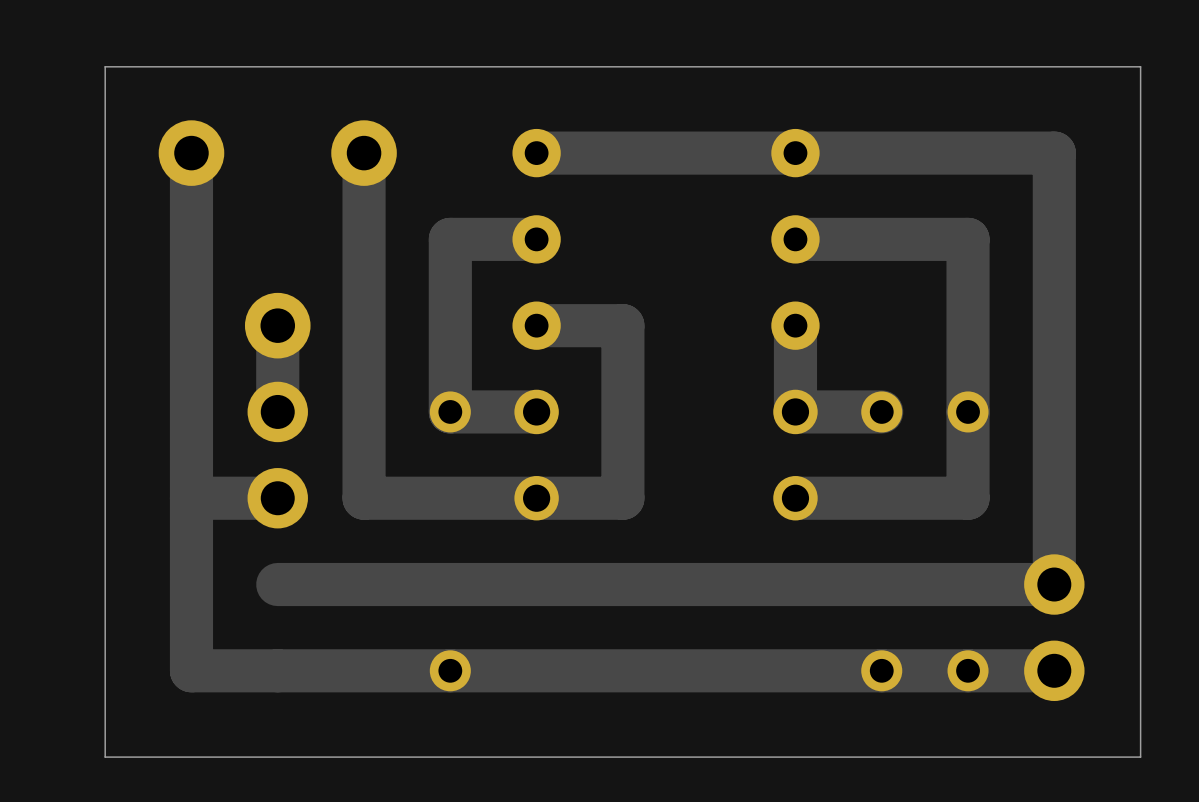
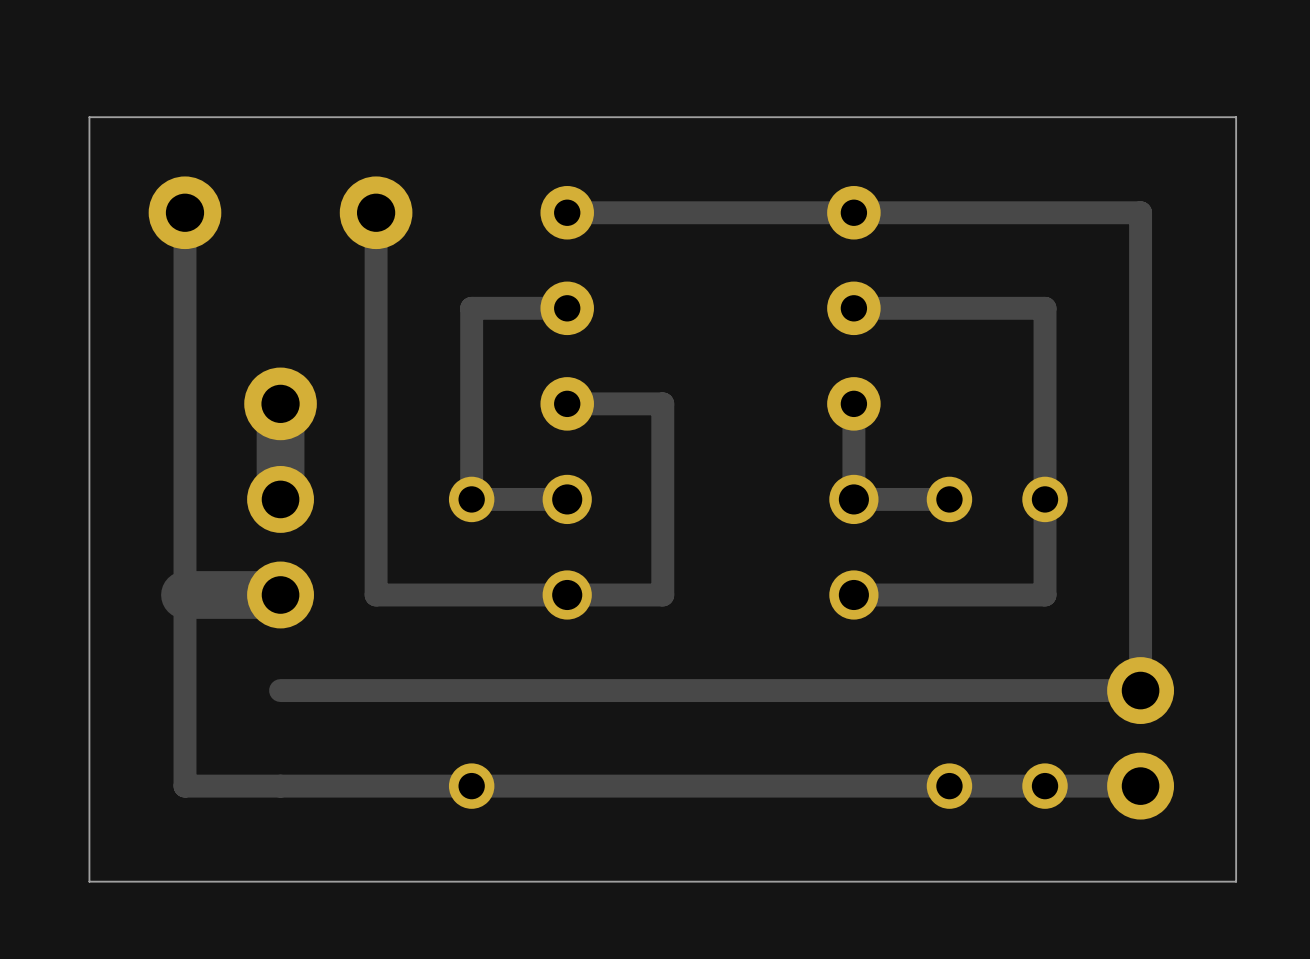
track width: thick (191, 153) (191, 670) (1054, 670) -> thin (184, 212) (184, 786) (1140, 786)
track width: thick (364, 153) (364, 498) (622, 498) (622, 325) (536, 325) -> thin (376, 212) (376, 594) (662, 594) (662, 403) (567, 403)
track width: thick (536, 153) (1054, 153) (1054, 584) (277, 584) -> thin (567, 212) (1140, 212) (1140, 690) (280, 690)
track width: thick (536, 239) (450, 239) (450, 411) (536, 411) -> thin (567, 308) (471, 308) (471, 499) (567, 499)
track width: thick (795, 239) (968, 239) (968, 498) (795, 498) -> thin (853, 308) (1045, 308) (1045, 594) (853, 594)
track width: thick (795, 325) (795, 411) (881, 411) -> thin (853, 403) (853, 499) (949, 499)

